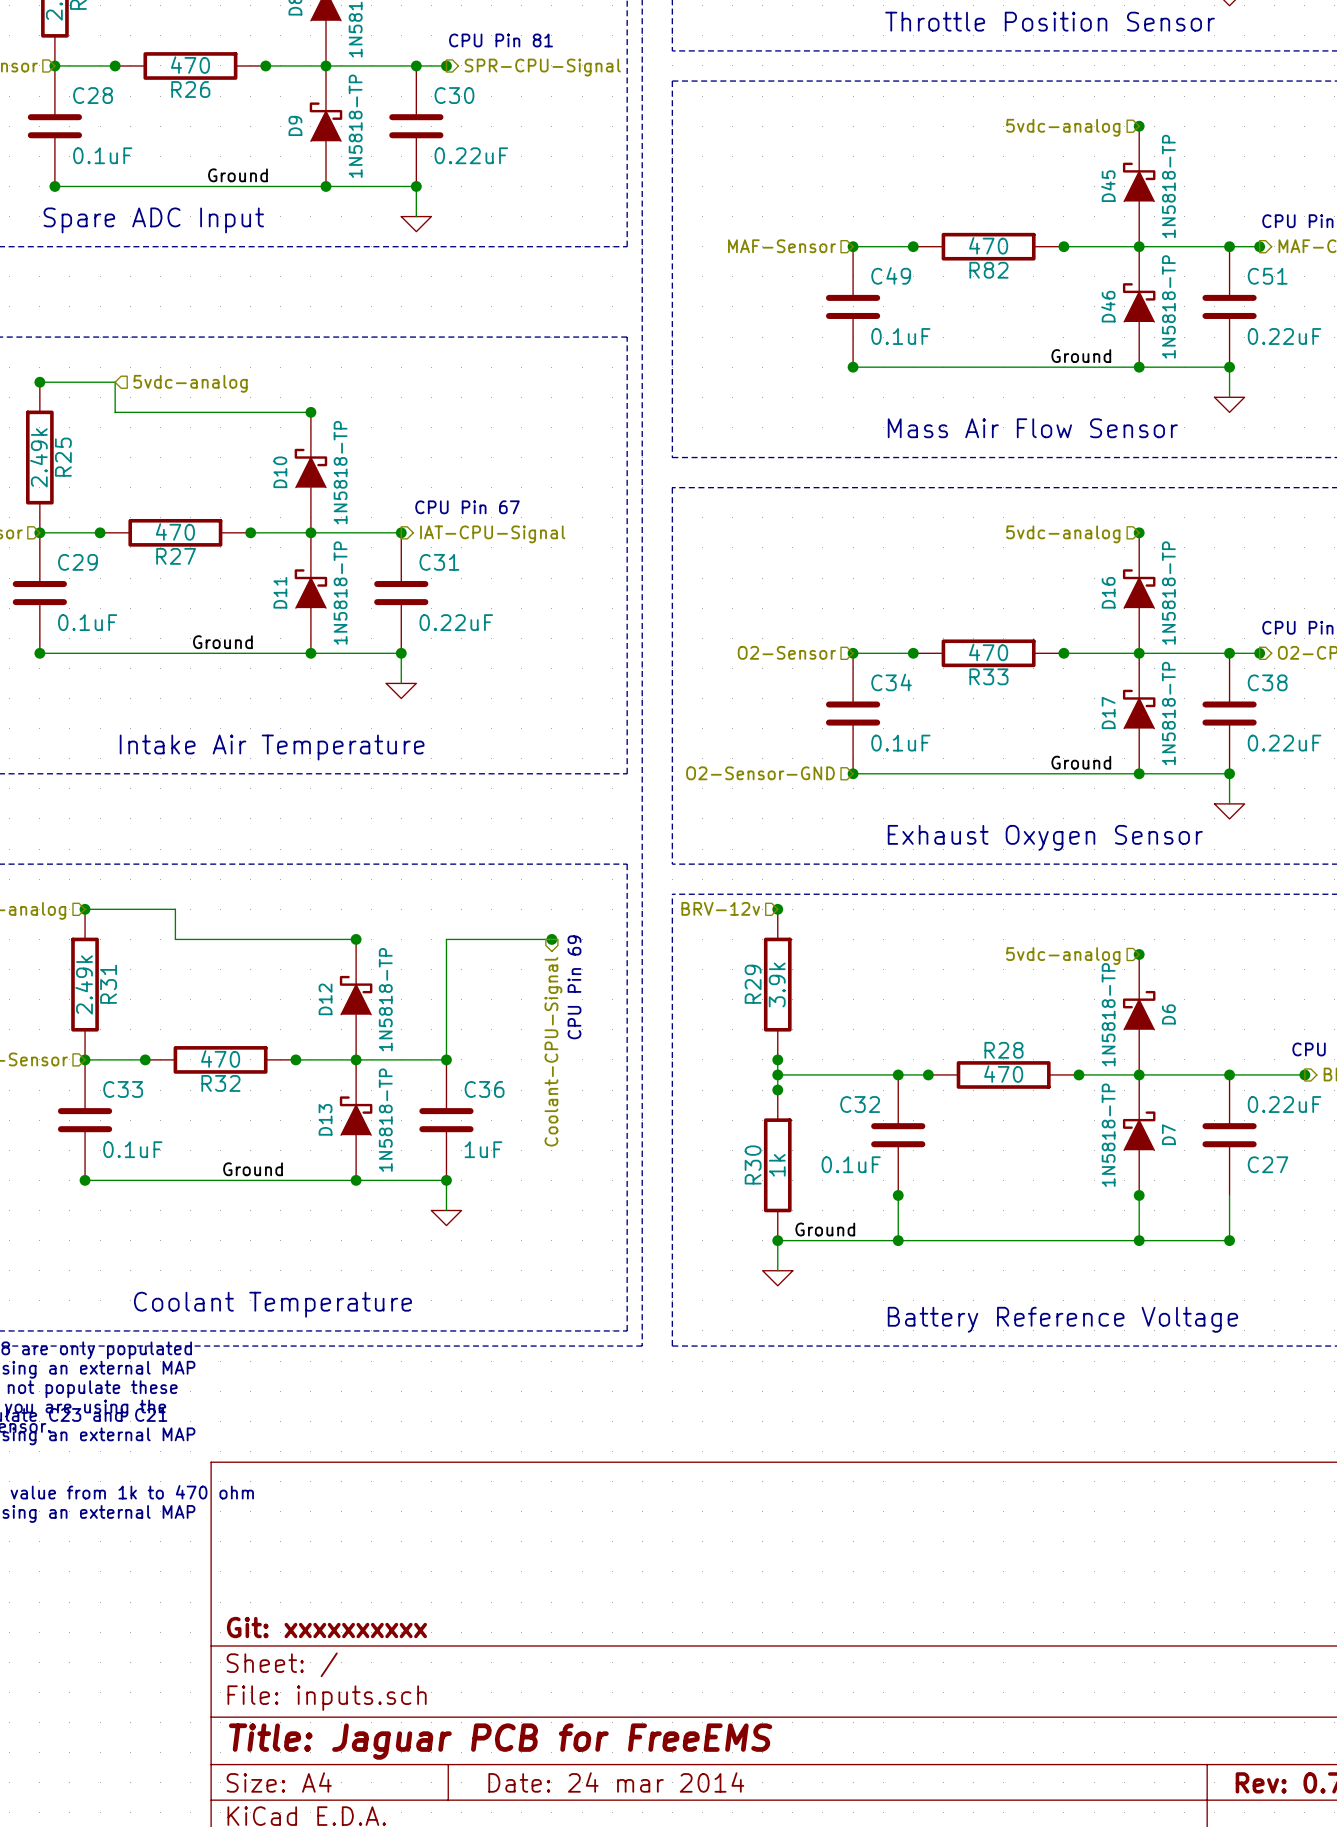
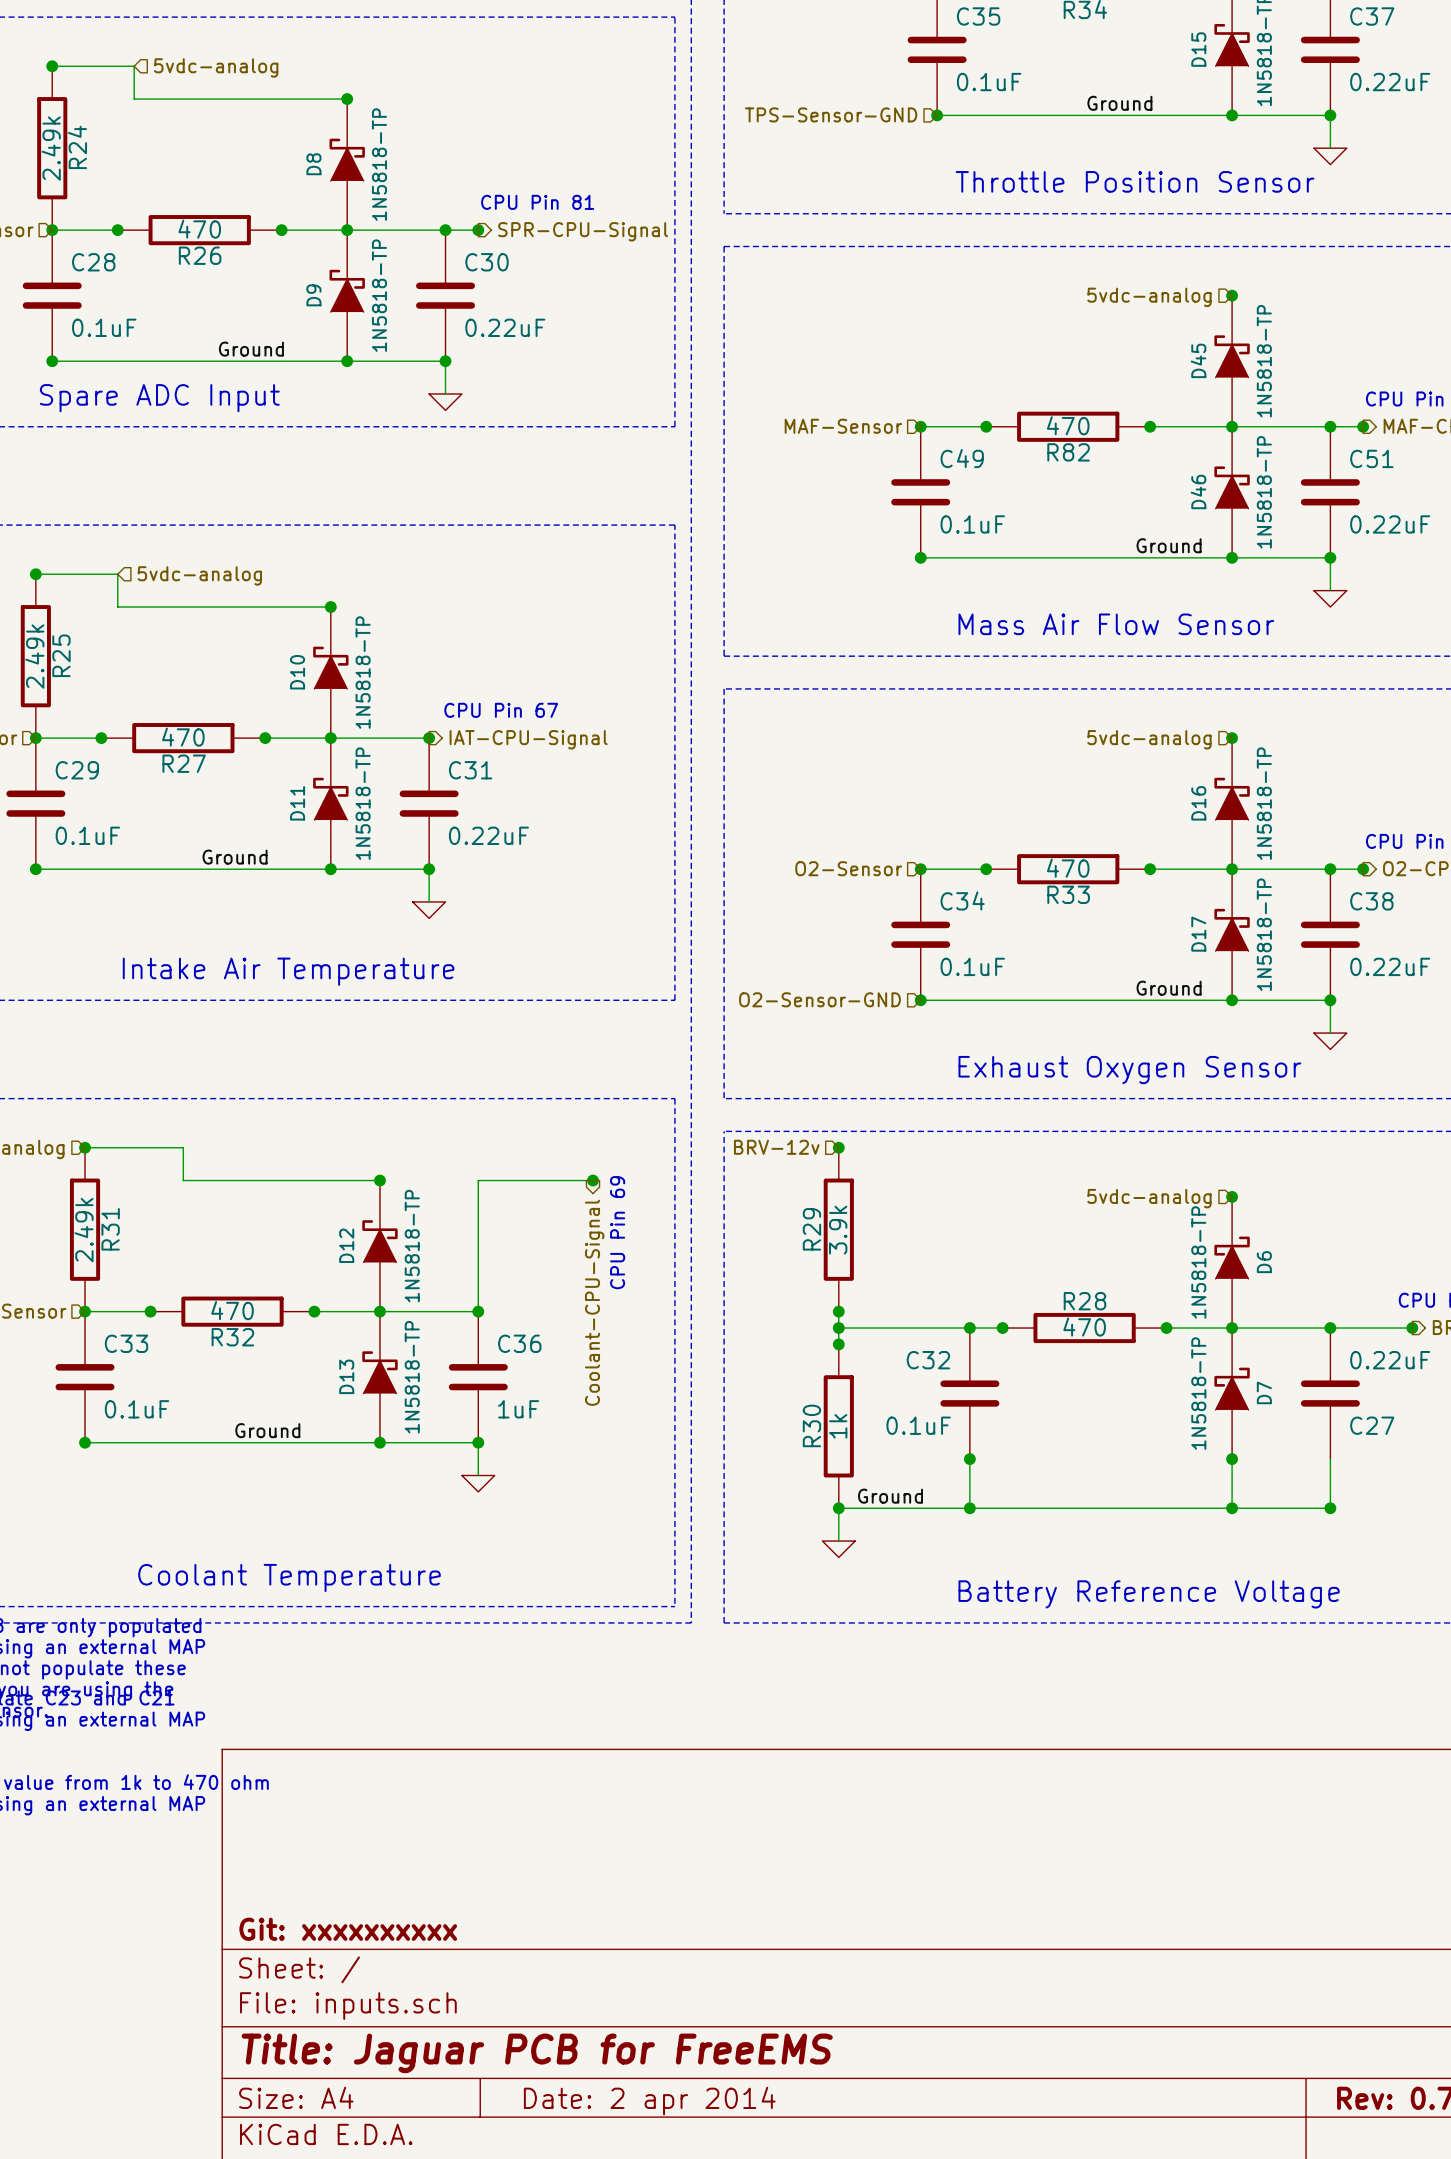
title block: Date: 24 mar 2014 (616, 1782) -> Date: 2 apr 2014 (649, 2101)

